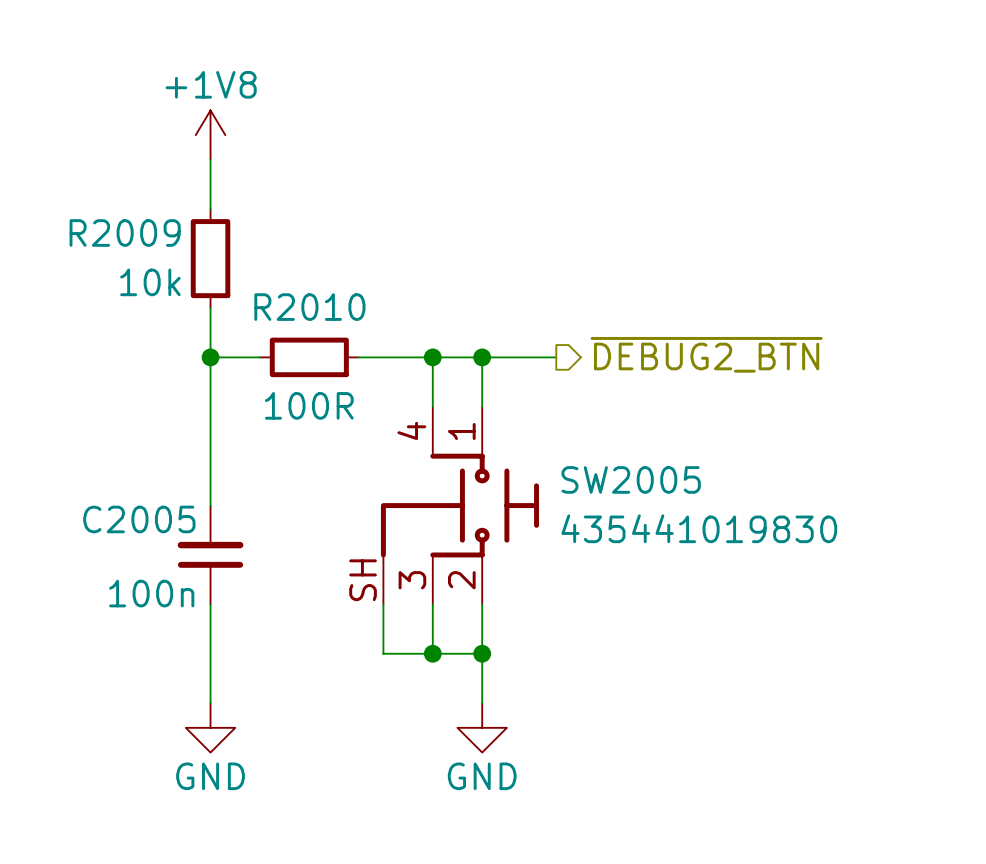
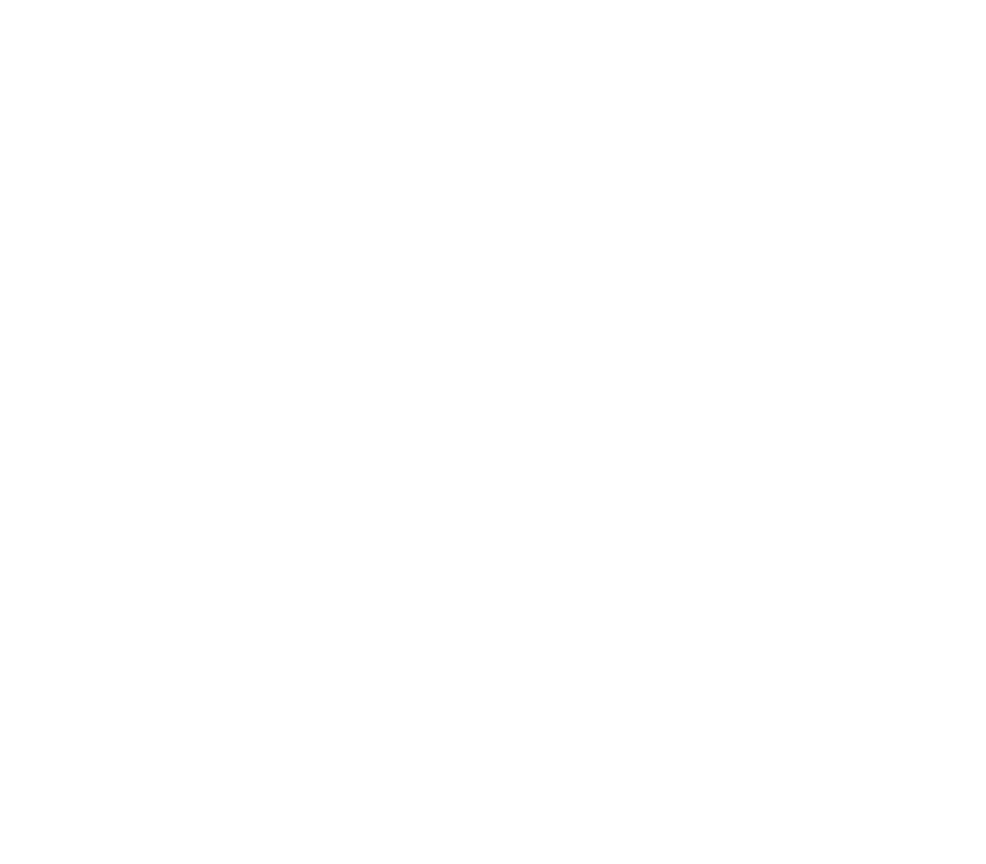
power symbol: +1V8 (210, 135) -> none
wire: (210, 159) (210, 209) -> none
R2009: (210, 258) -> none
wire: (210, 308) (210, 505) -> none
hierarchical label: ~{DEBUG2_BTN} (706, 354) -> none
wire: (210, 357) (259, 357) -> none
junction: (210, 357) -> none
R2010: (309, 357) -> none
wire: (358, 357) (556, 357) -> none
wire: (432, 357) (432, 406) -> none
junction: (432, 357) -> none
wire: (482, 357) (482, 406) -> none
junction: (482, 357) -> none
SW2005: (459, 505) -> none
C2005: (210, 554) -> none
wire: (210, 604) (210, 703) -> none
wire: (383, 604) (383, 653) (482, 653) -> none
wire: (432, 604) (432, 653) -> none
wire: (482, 604) (482, 703) -> none
junction: (432, 653) -> none
junction: (482, 653) -> none
power symbol: GND (210, 727) -> none
power symbol: GND (482, 727) -> none

